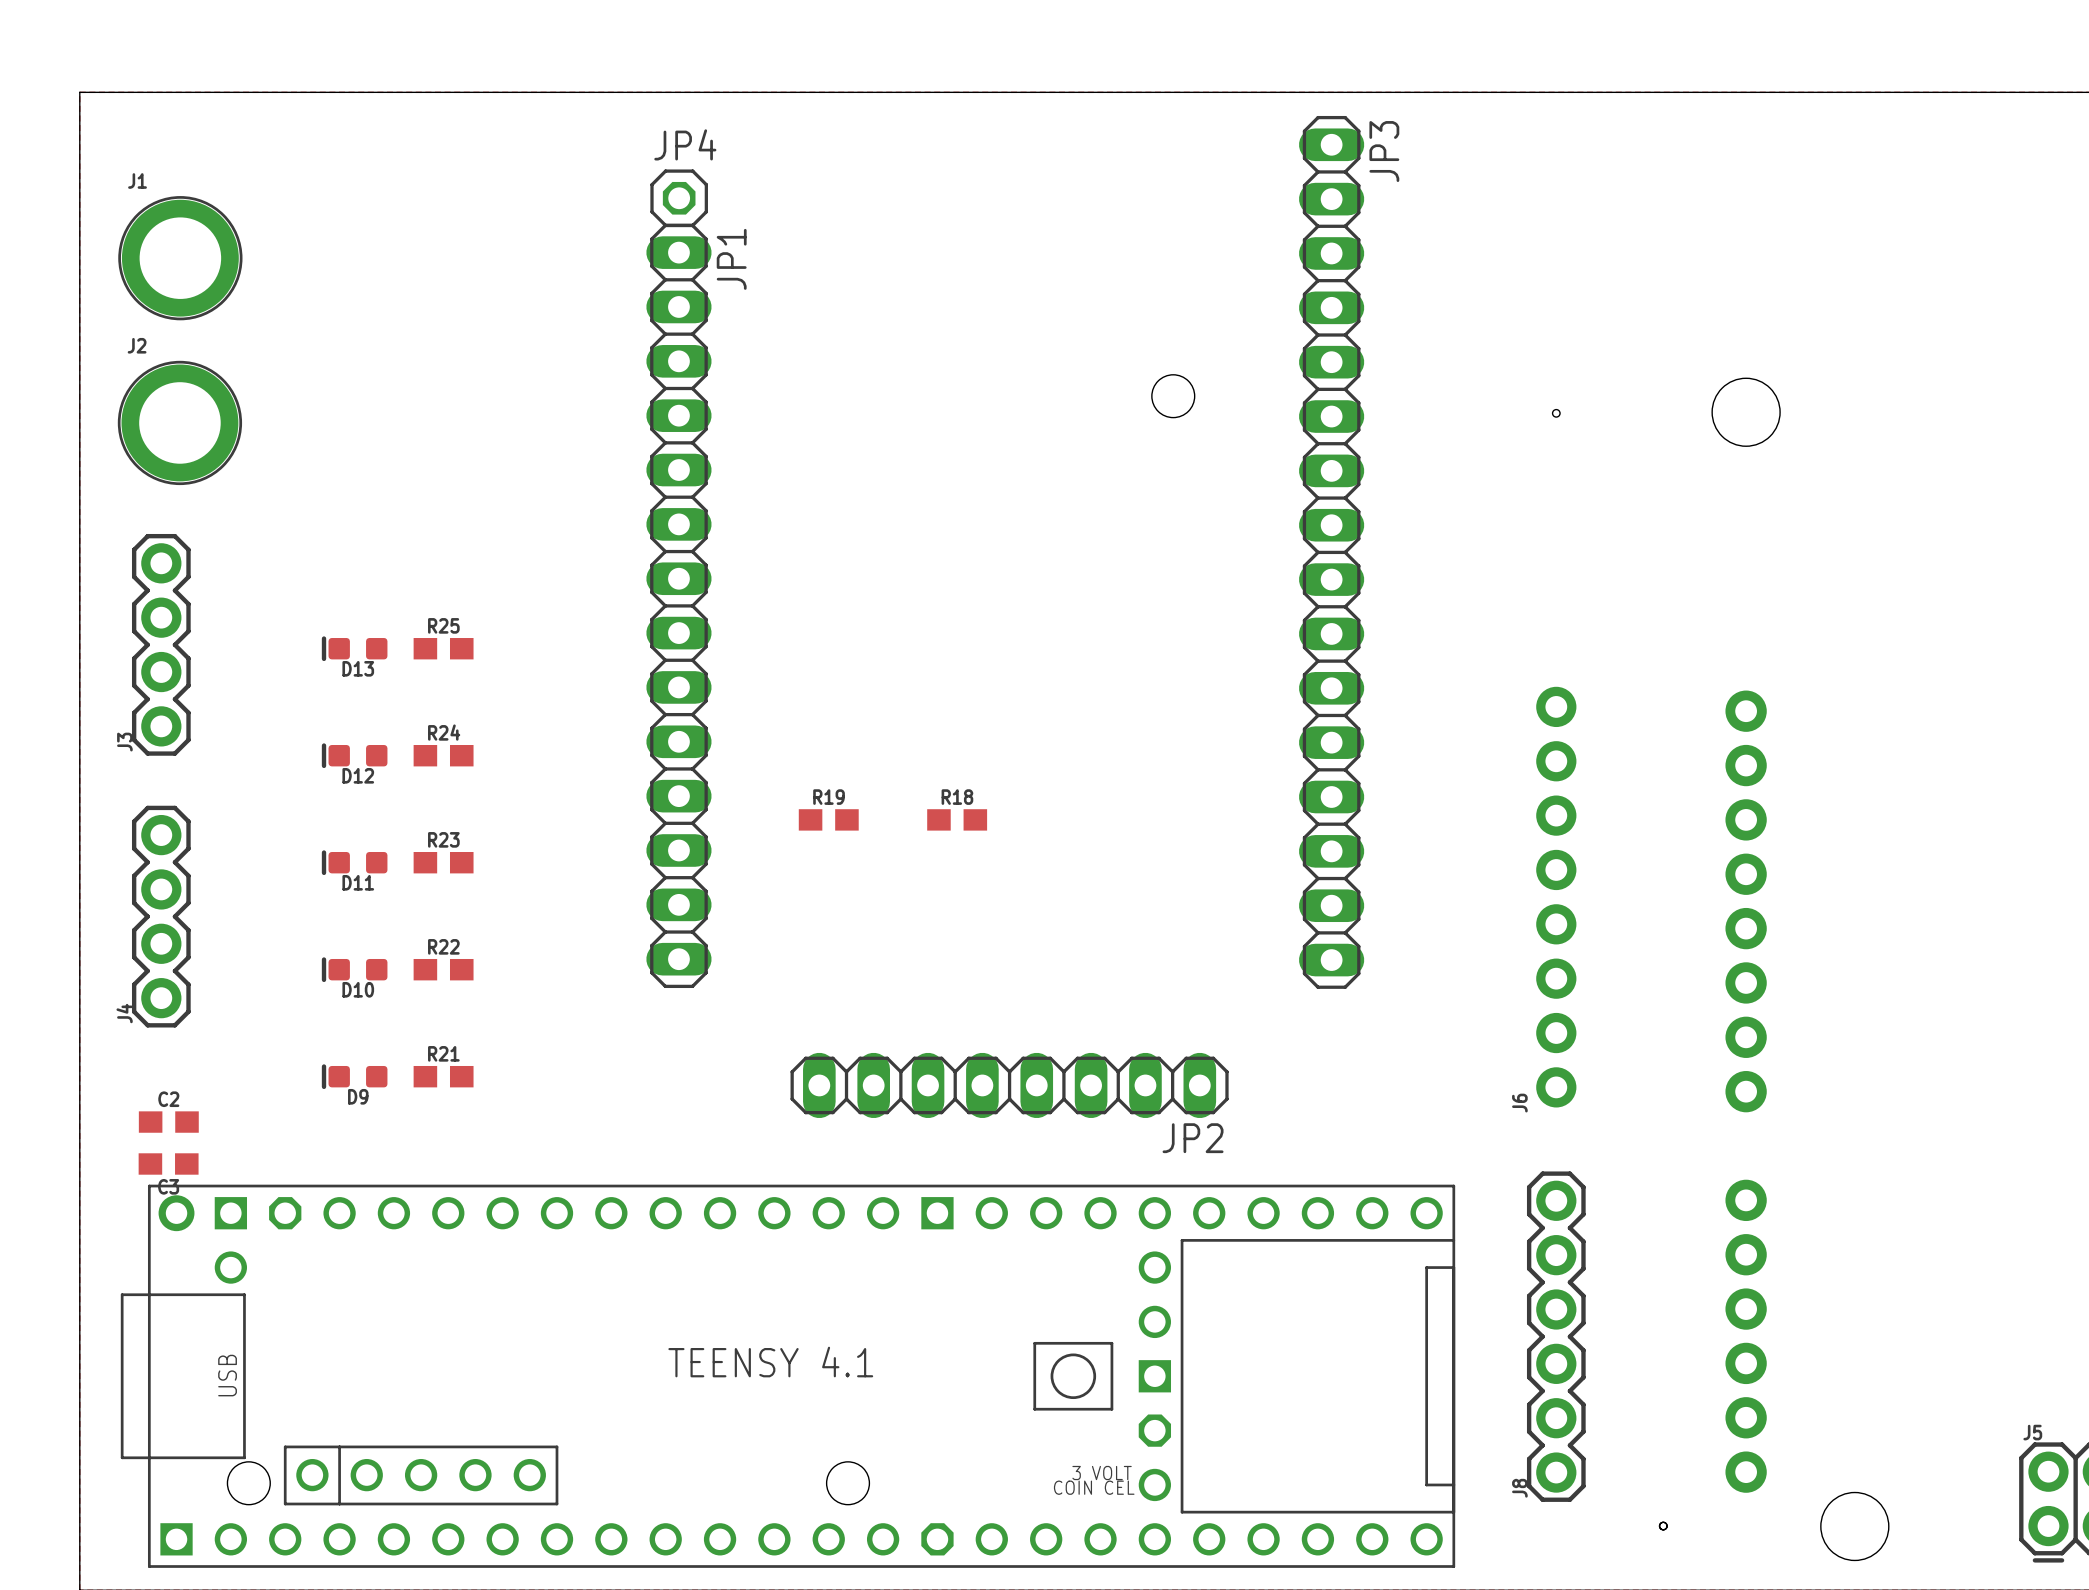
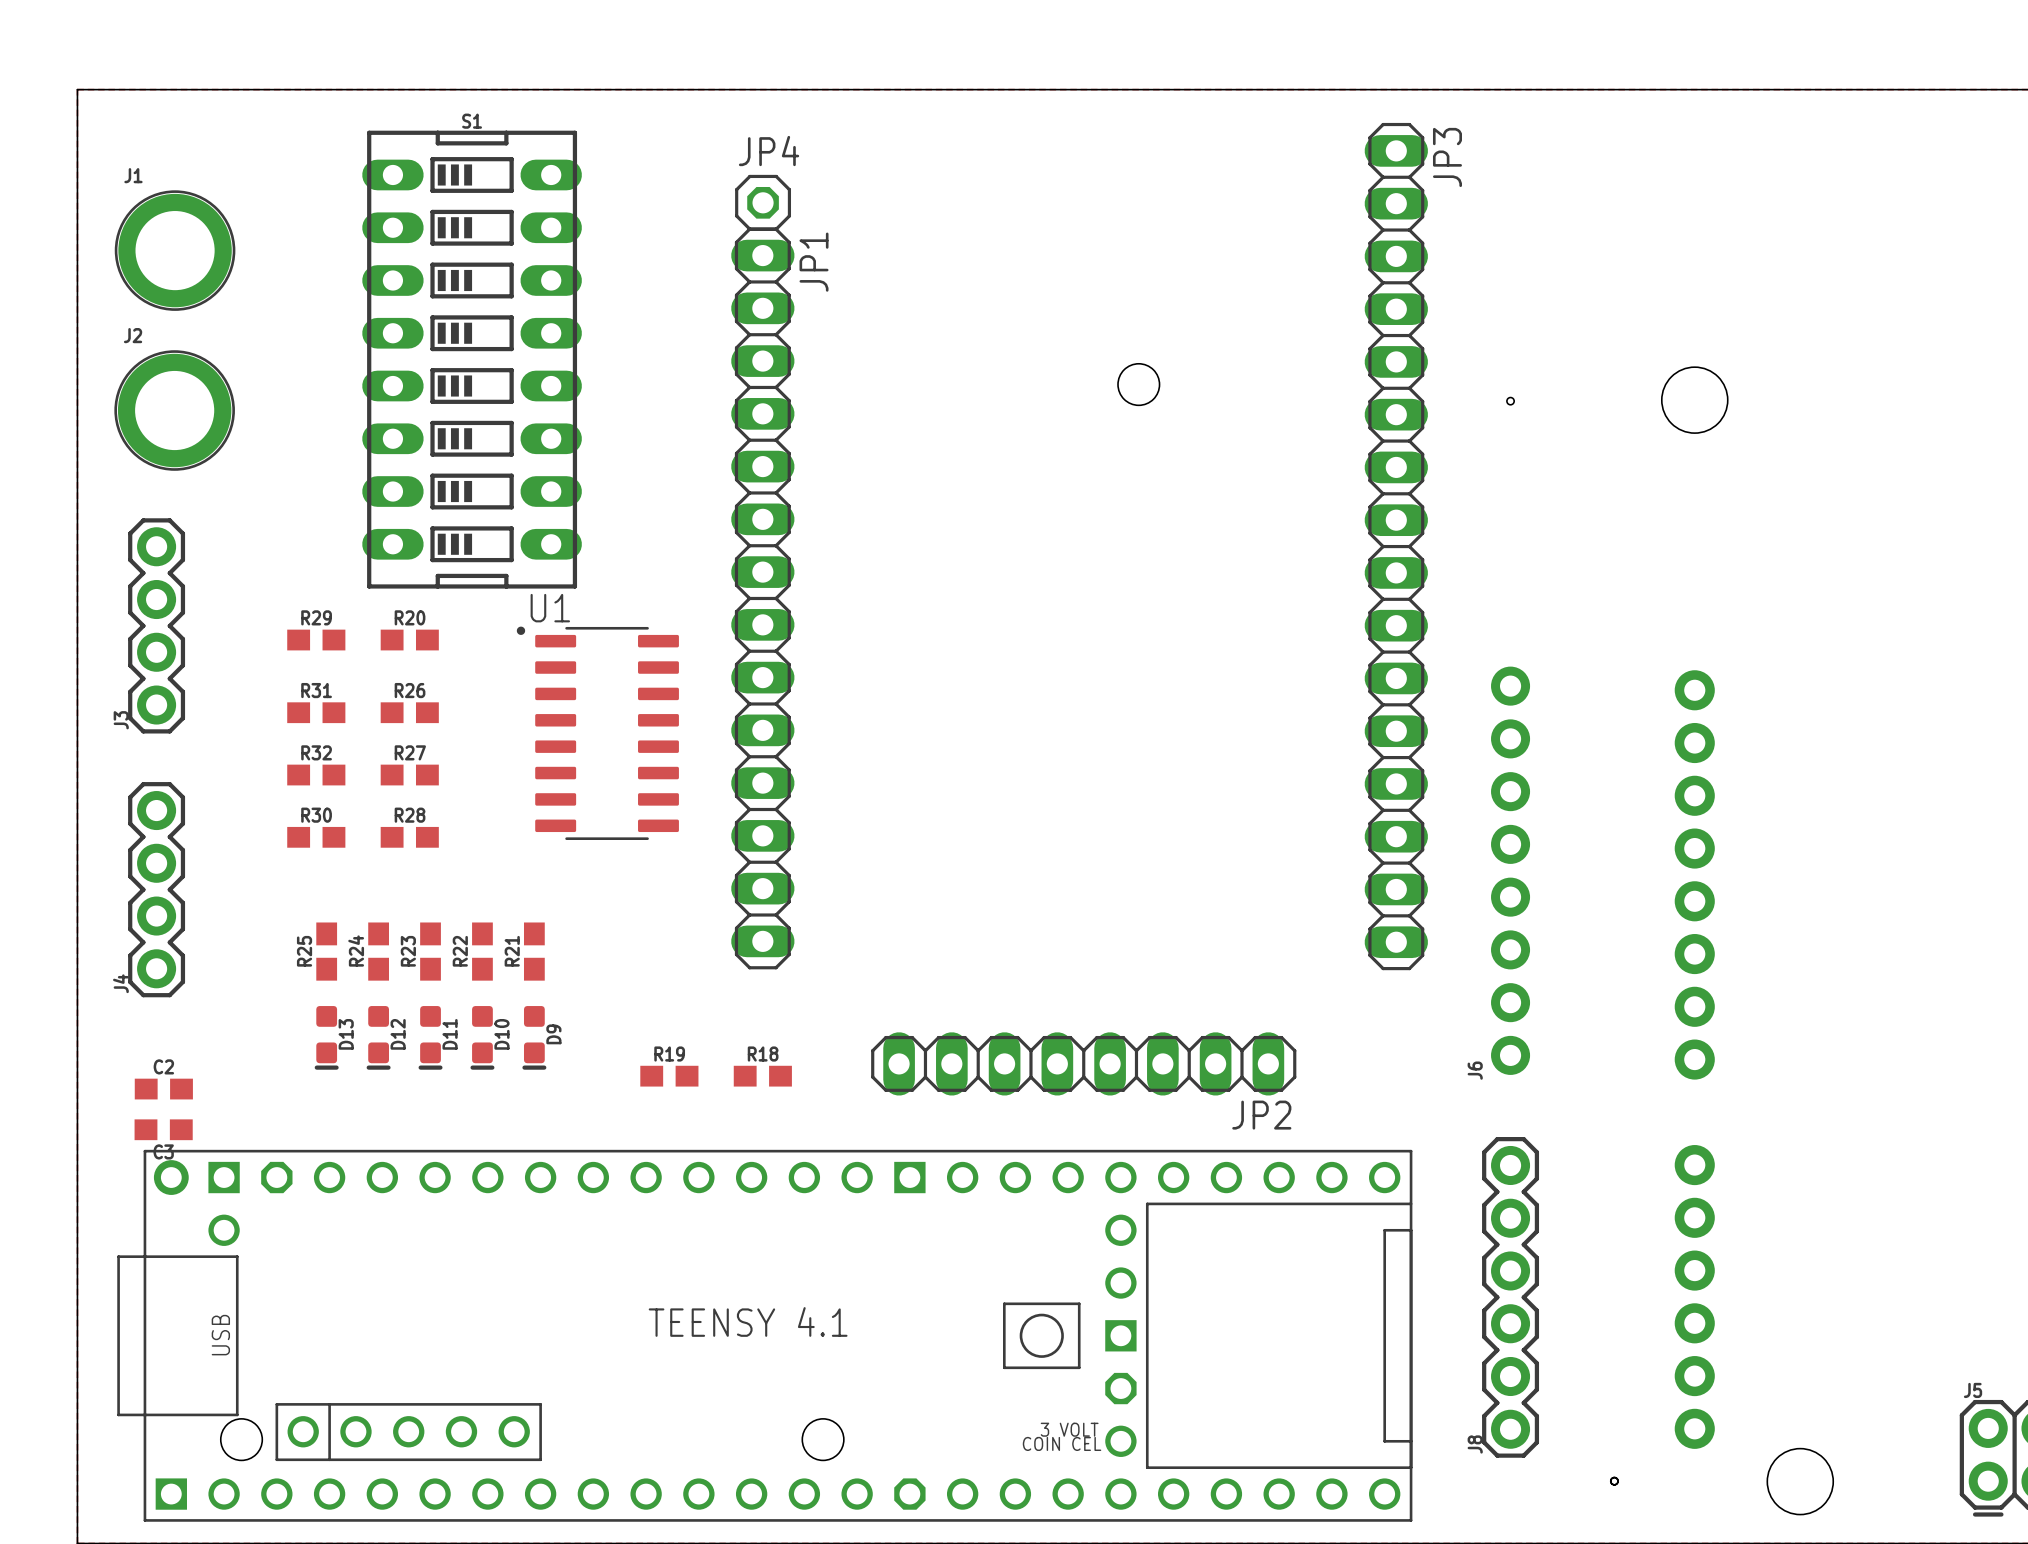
JP4 position: (679, 198) -> (763, 202)
S1: none -> (472, 359)
JP3 position: (1331, 552) -> (1396, 546)
JP1 position: (678, 605) -> (762, 598)
D13 rotation: 0° (354, 648) -> 90° counterclockwise (326, 1037)
D13 position: (354, 648) -> (326, 1037)
R25 rotation: 0° (443, 648) -> 90° clockwise (326, 951)
R25 position: (443, 648) -> (326, 951)
R29: none -> (316, 640)
R20: none -> (409, 640)
R31: none -> (316, 712)
R26: none -> (409, 712)
D12 rotation: 0° (354, 755) -> 90° counterclockwise (378, 1037)
D12 position: (354, 755) -> (378, 1037)
R24 rotation: 0° (443, 755) -> 90° clockwise (378, 951)
R24 position: (443, 755) -> (378, 951)
U1: none -> (597, 733)
R32: none -> (316, 775)
R27: none -> (409, 775)
R19 position: (828, 819) -> (669, 1076)
R18 position: (957, 819) -> (762, 1076)
R30: none -> (316, 837)
D11 rotation: 0° (354, 862) -> 90° counterclockwise (430, 1037)
D11 position: (354, 862) -> (430, 1037)
R28: none -> (409, 837)
R23 rotation: 0° (443, 862) -> 90° clockwise (430, 951)
R23 position: (443, 862) -> (430, 951)
D10 rotation: 0° (354, 969) -> 90° counterclockwise (482, 1037)
D10 position: (354, 969) -> (482, 1037)
R22 rotation: 0° (443, 969) -> 90° clockwise (482, 951)
R22 position: (443, 969) -> (482, 951)
D9 rotation: 0° (354, 1076) -> 90° counterclockwise (534, 1037)
D9 position: (354, 1076) -> (534, 1037)
R21 rotation: 0° (443, 1076) -> 90° clockwise (534, 951)
R21 position: (443, 1076) -> (534, 951)
JP2 position: (1009, 1085) -> (1083, 1063)

